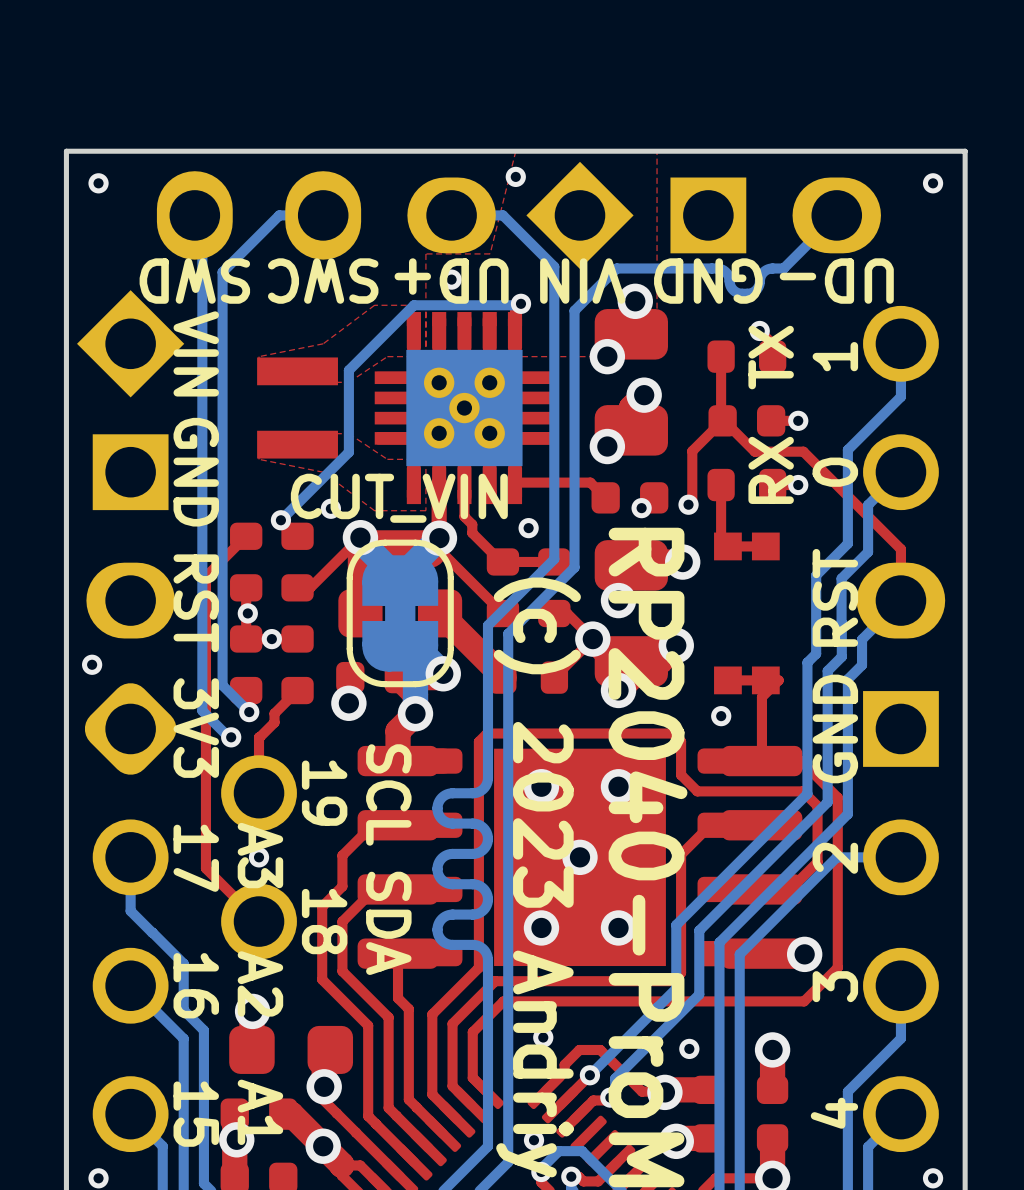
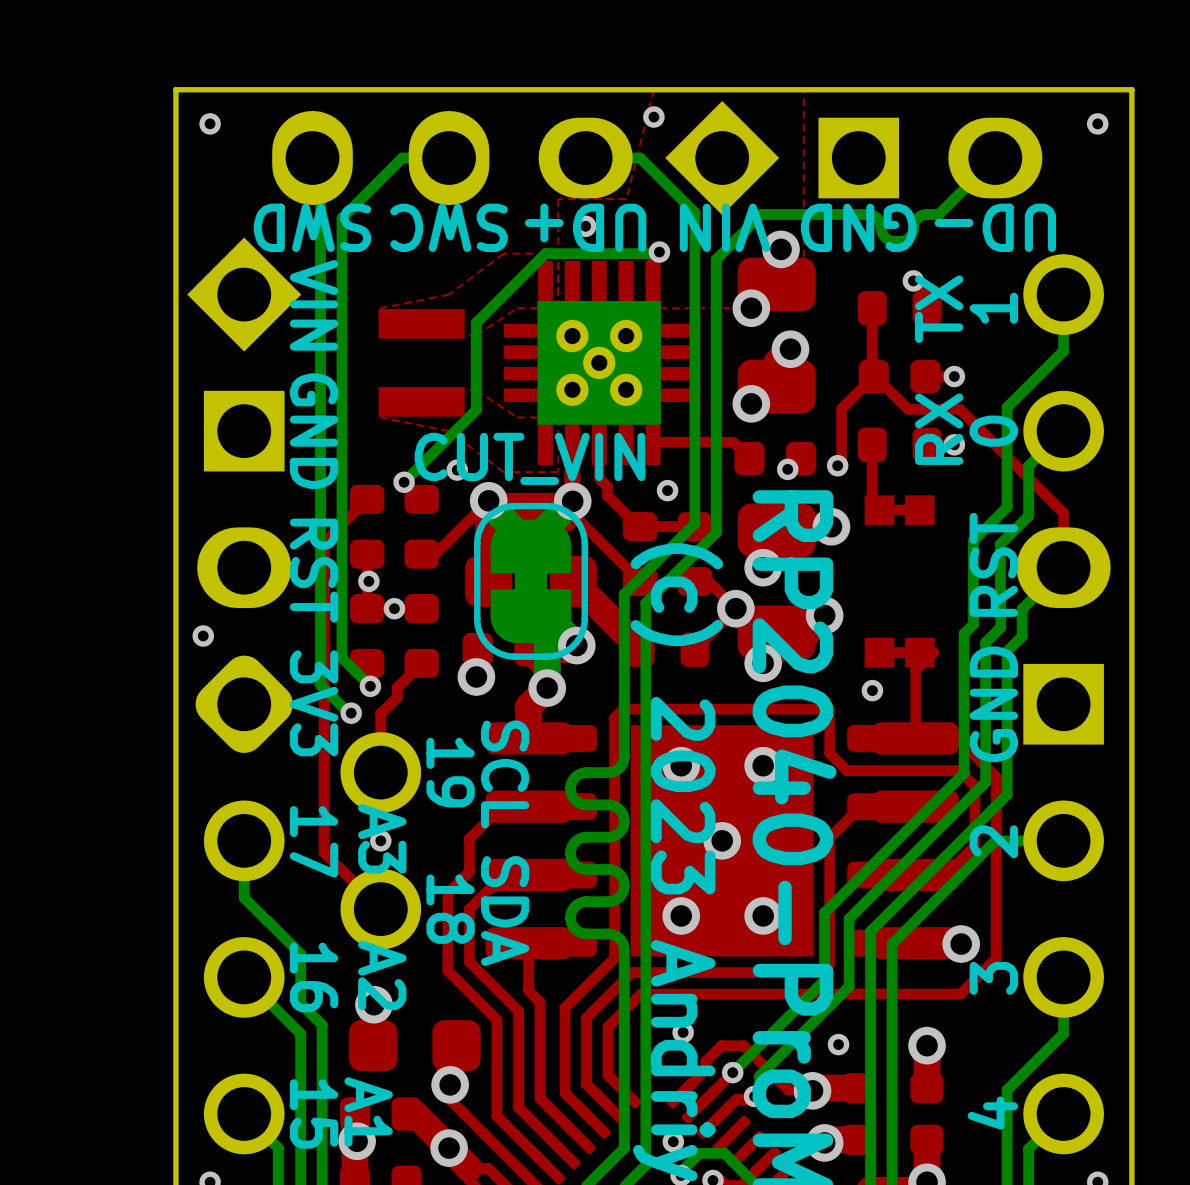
text position: TX (771, 357) -> TX (939, 309)
text position: RX (771, 470) -> RX (939, 429)
text position: SCL (388, 794) -> SCL (505, 774)
text position: SDA (388, 923) -> SDA (505, 911)
text position: A1 (260, 1112) -> A1 (368, 1112)

